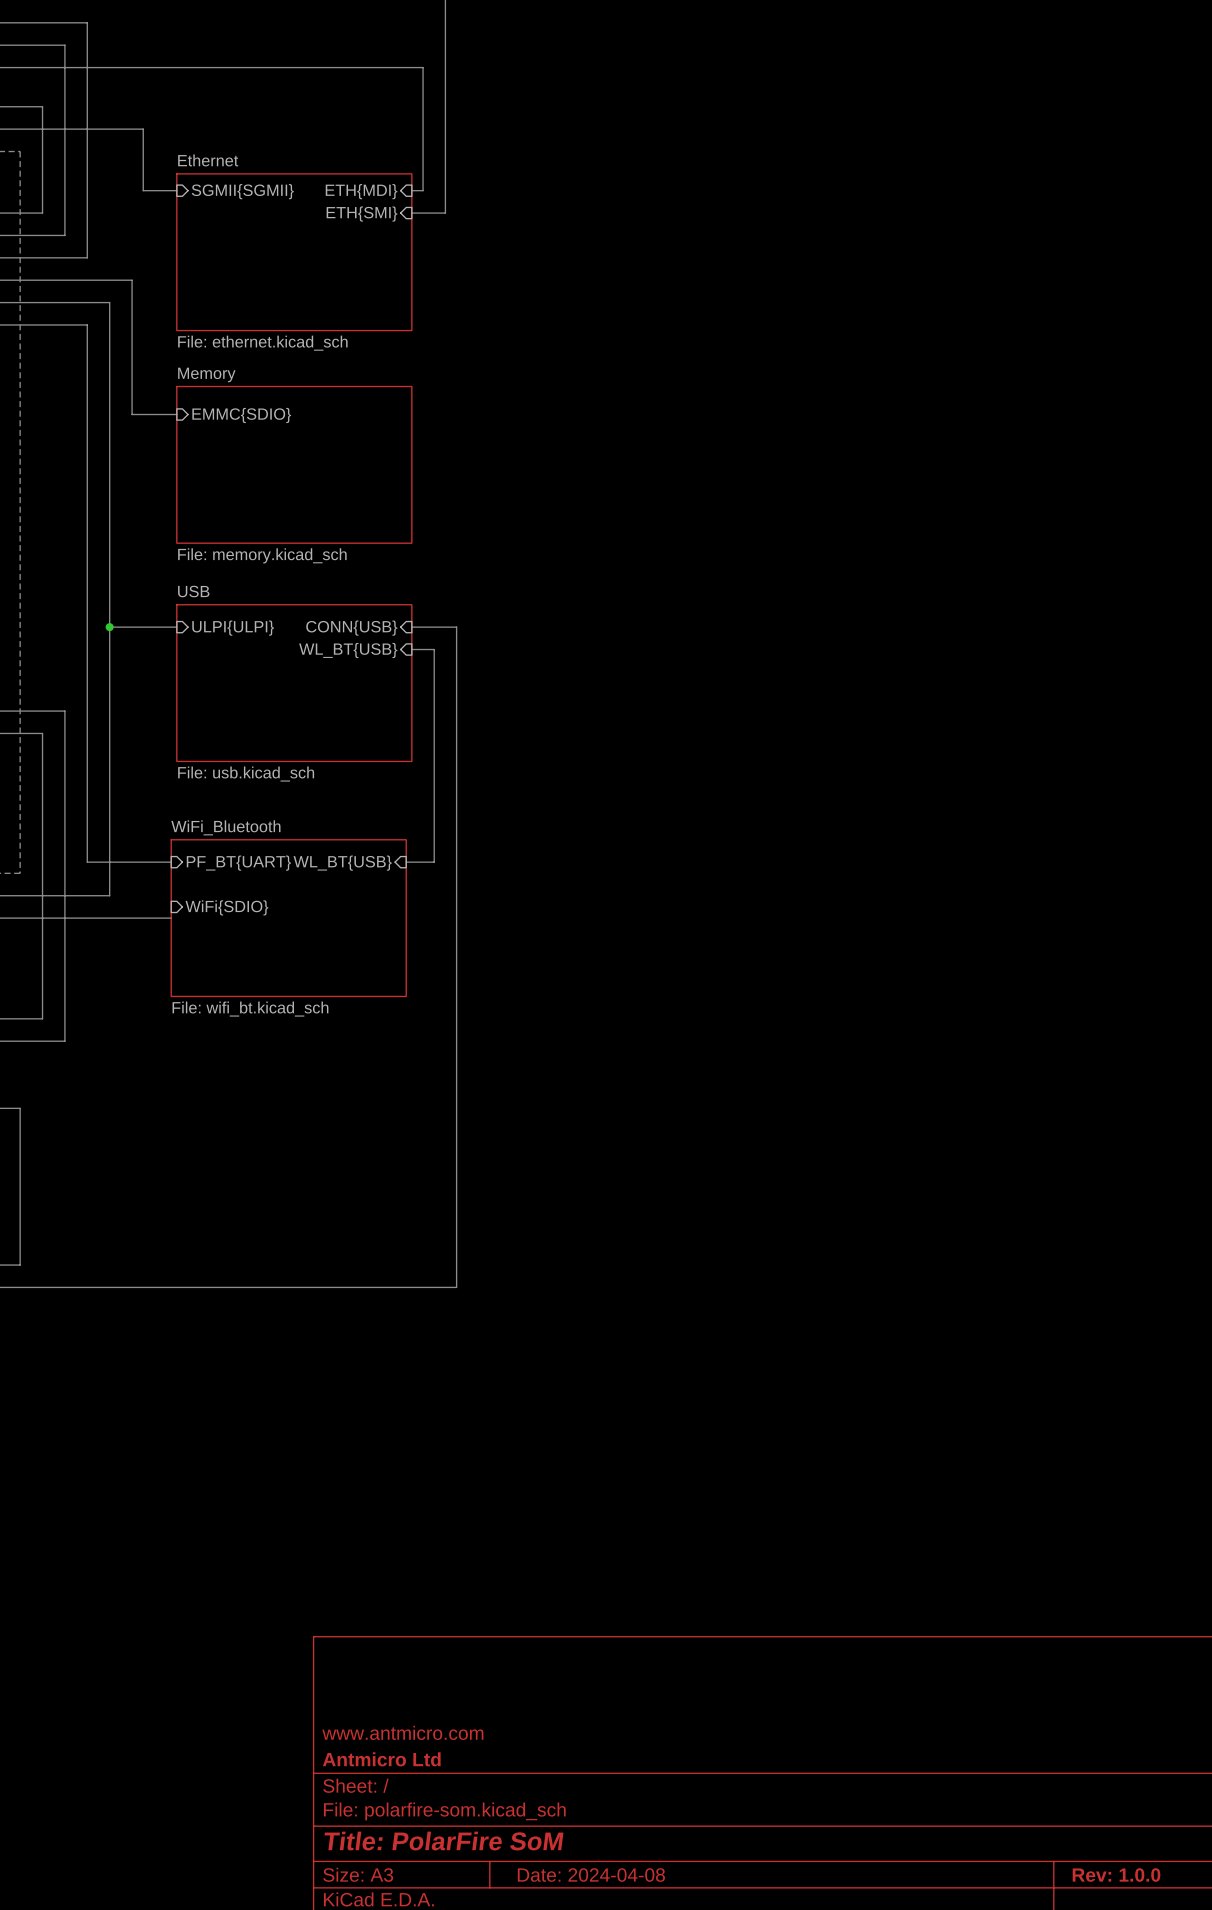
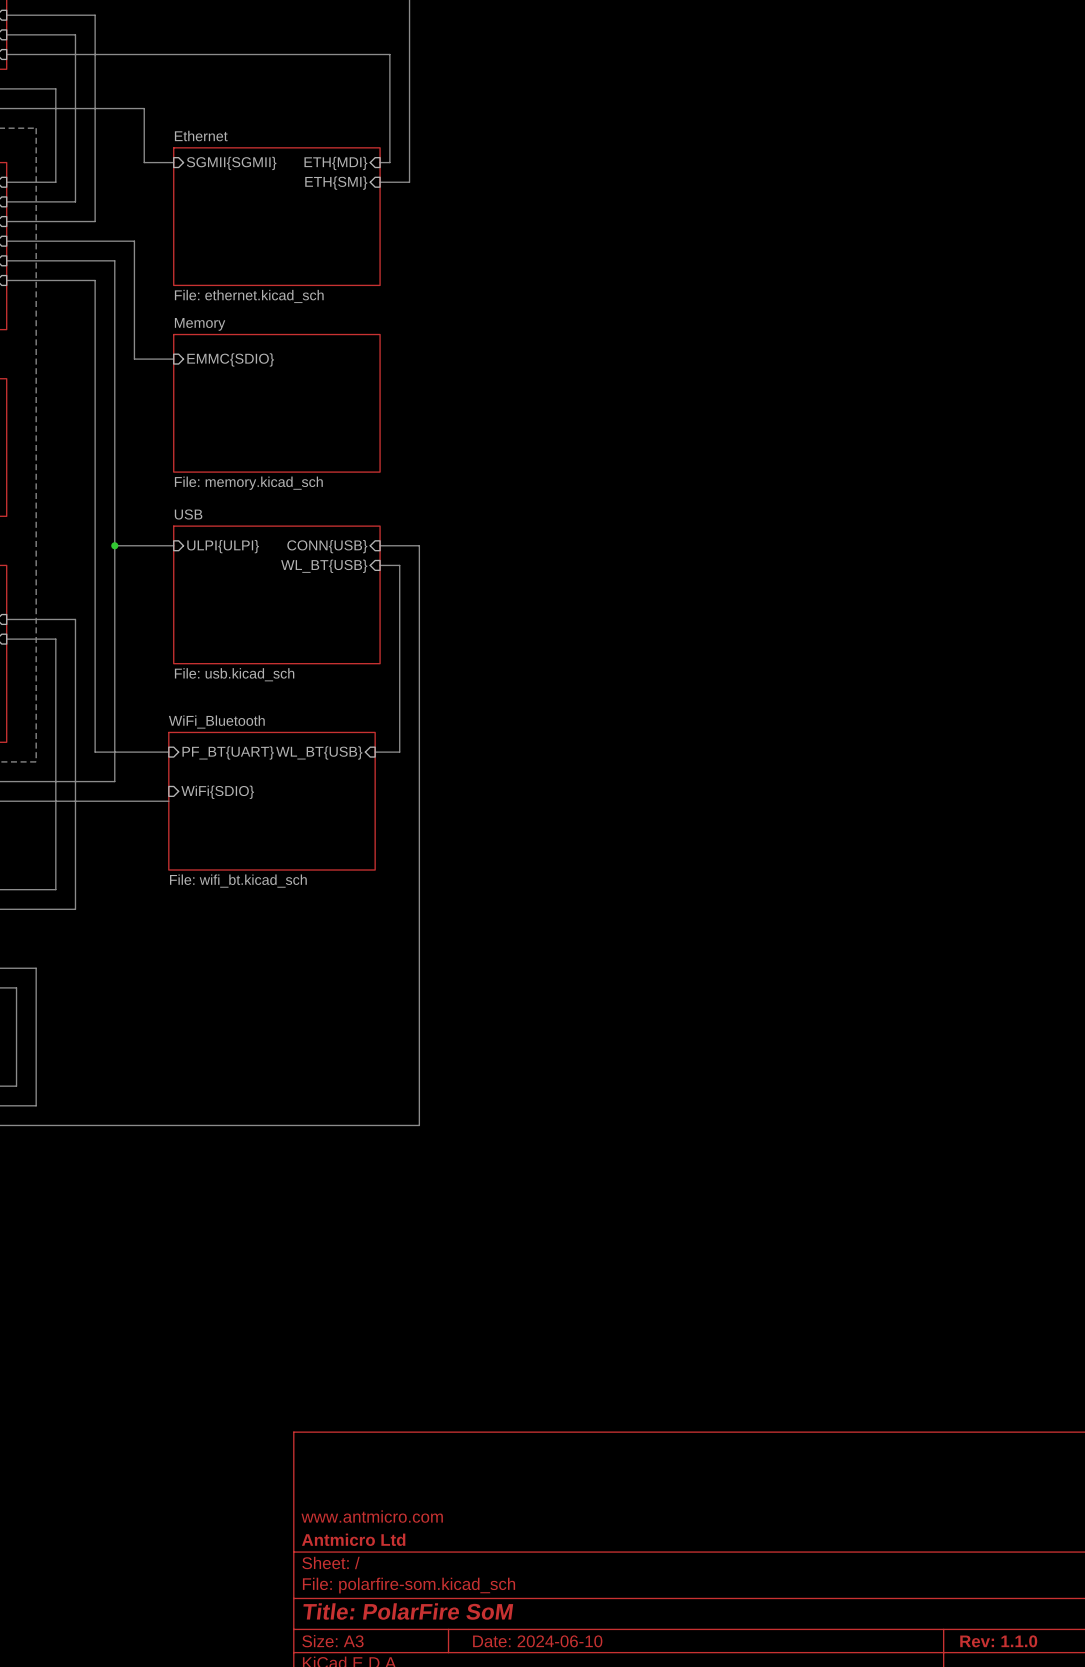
title block: Date: 2024-04-08 (591, 1875) -> Date: 2024-06-10 (537, 1641)
title block: Rev: 1.0.0 (1116, 1875) -> Rev: 1.1.0 (998, 1641)

